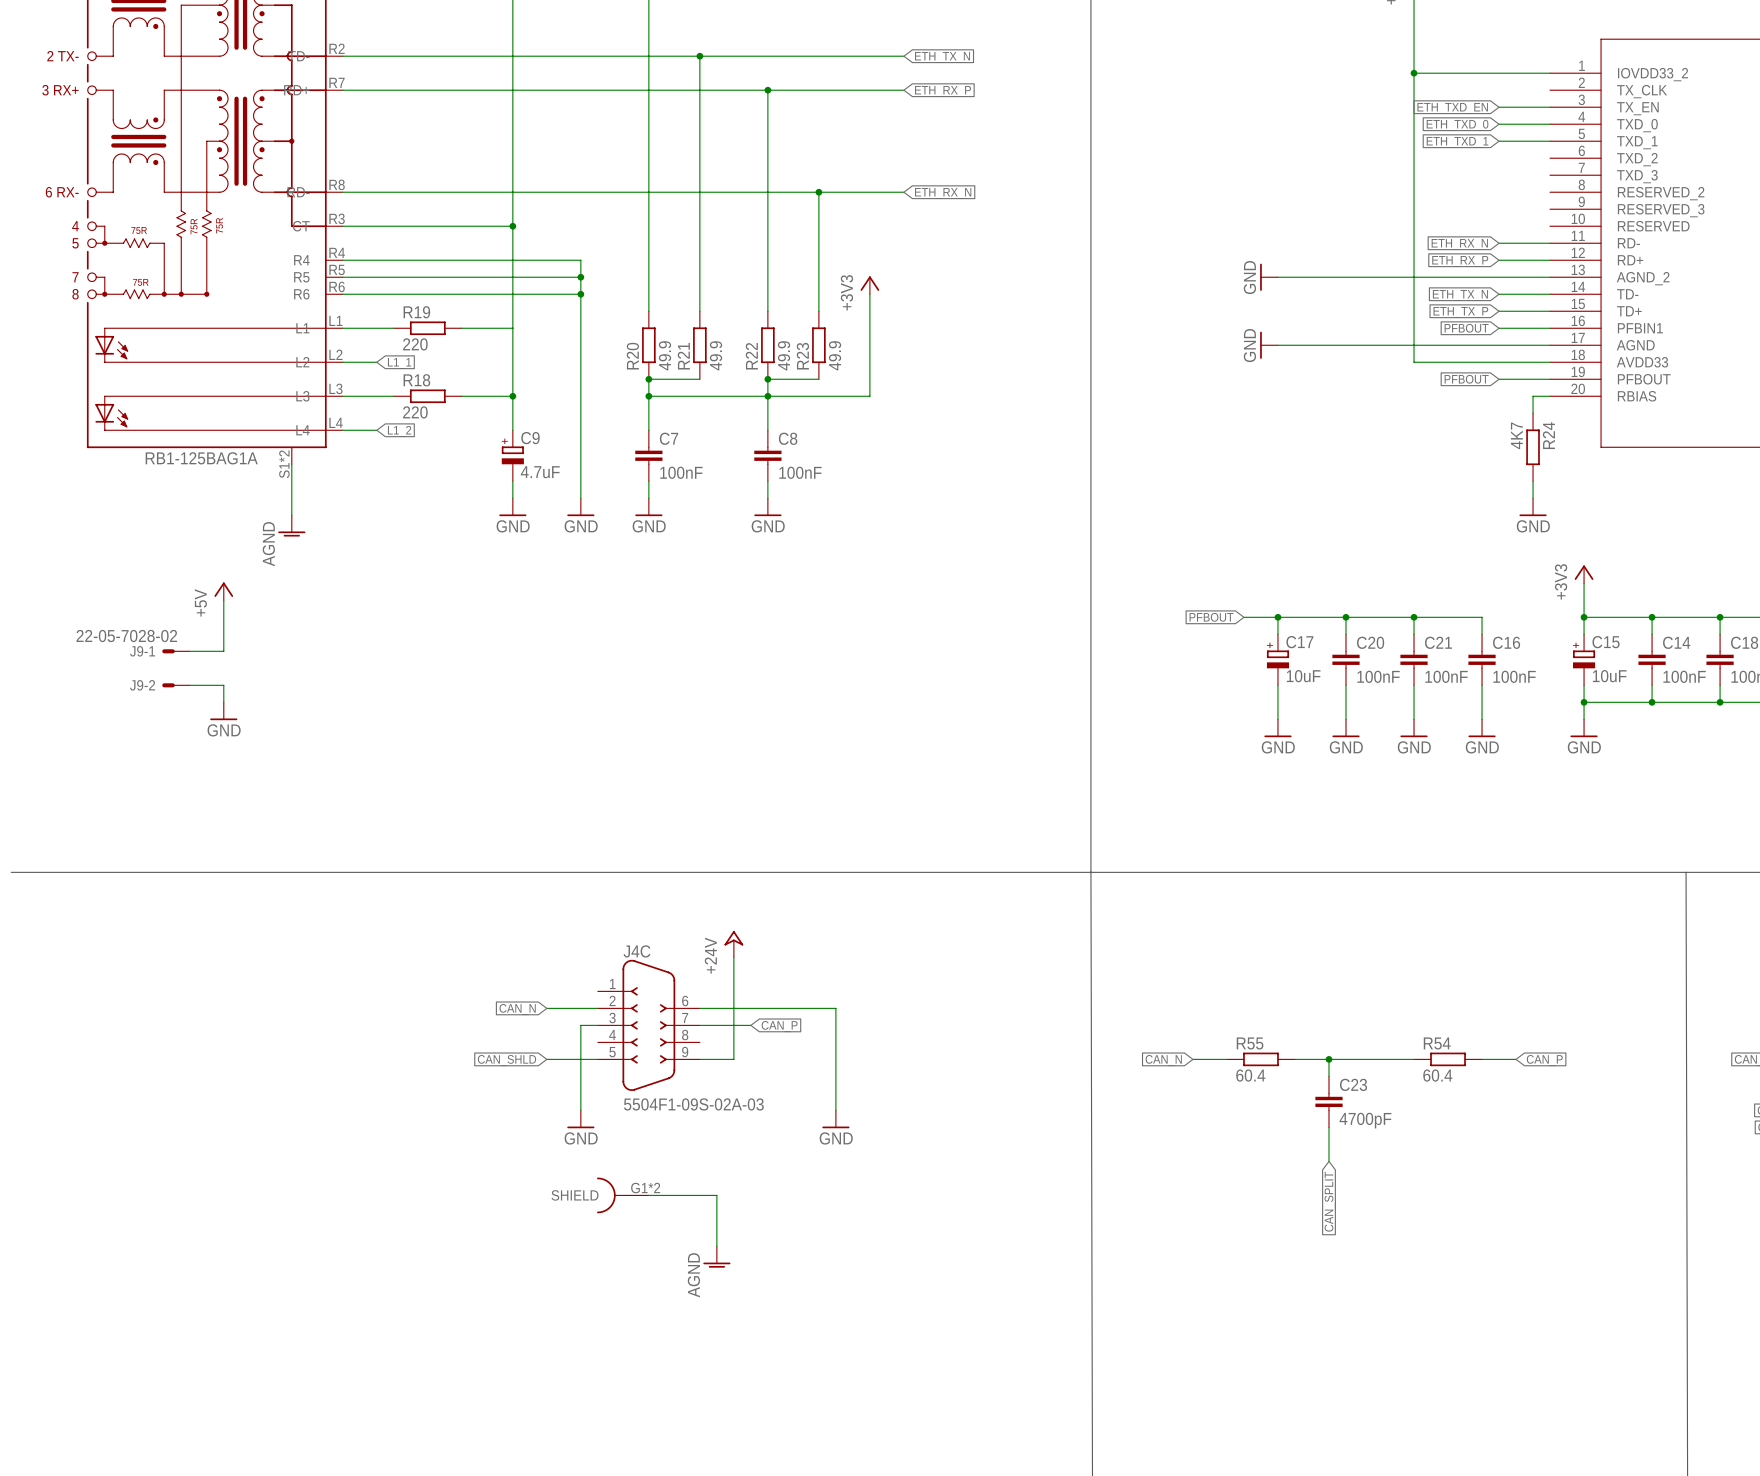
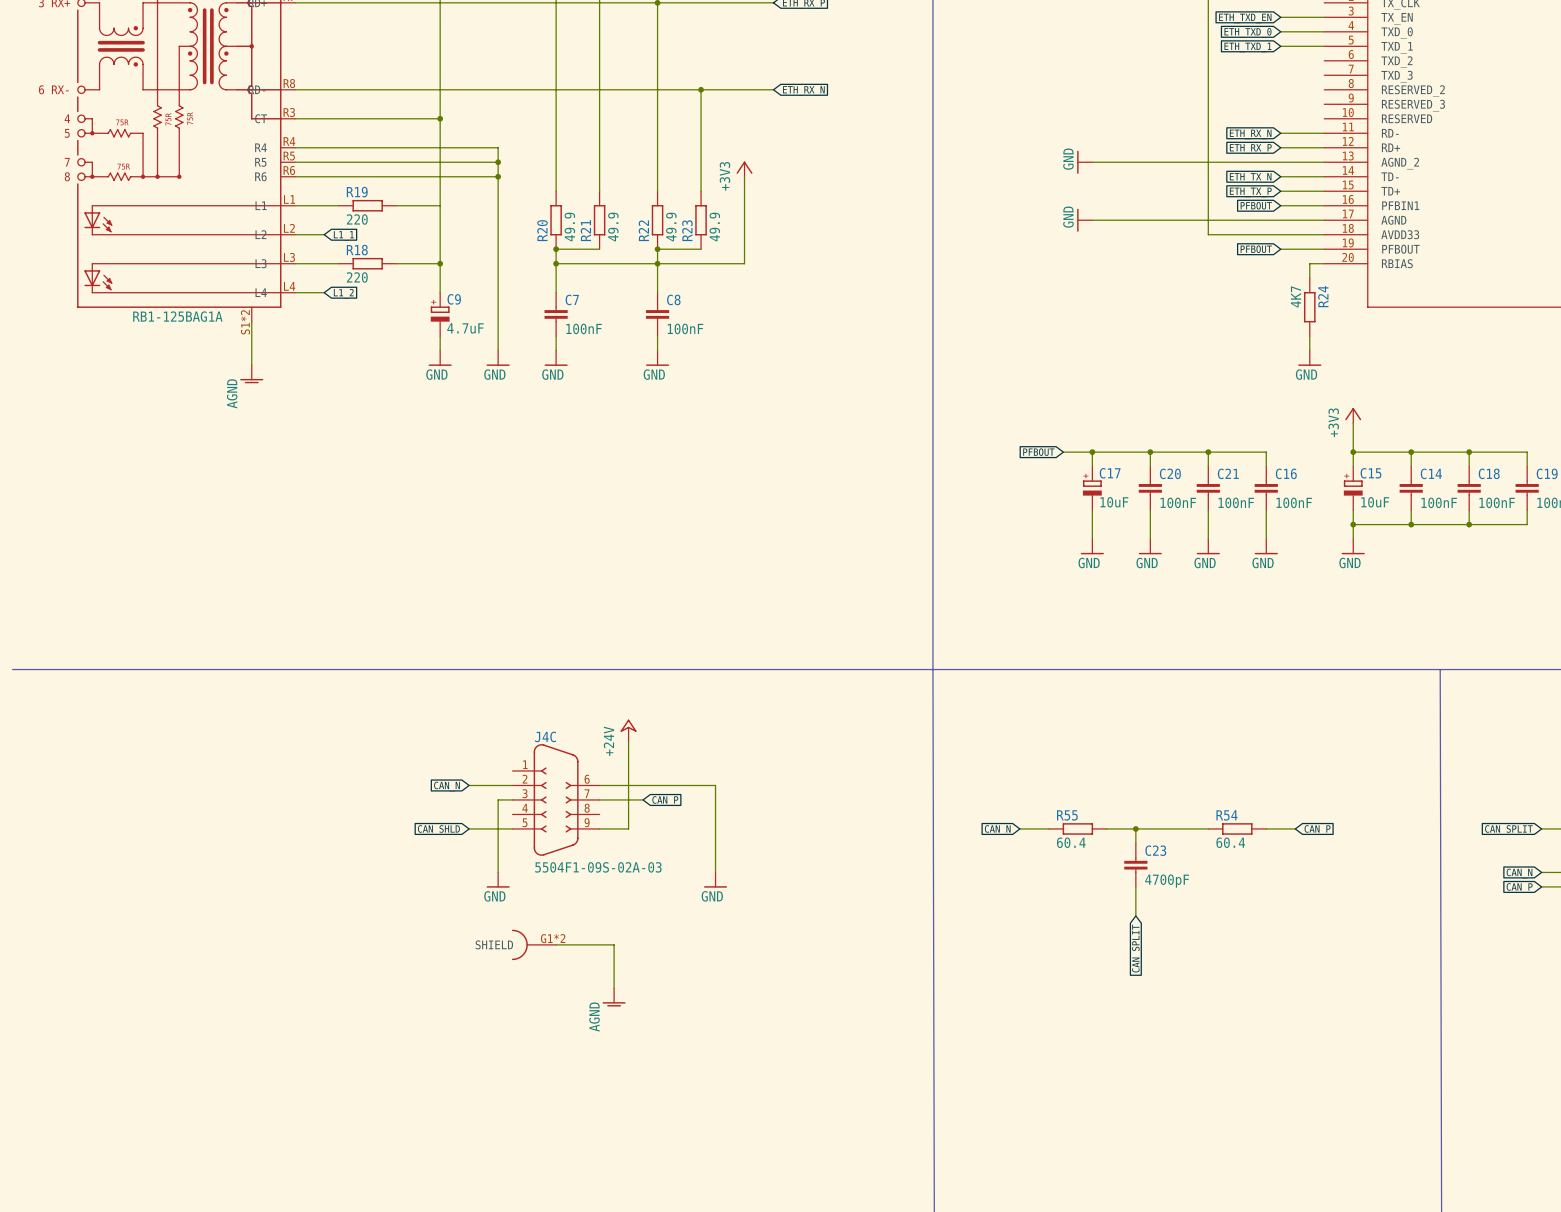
power symbol: +5V (223, 591) -> none
wire: (223, 600) (223, 651) (189, 651) -> none
J9-1: 22-05-7028-02 (176, 651) -> none
J9-2: (176, 685) -> none
wire: (189, 685) (223, 685) (223, 702) -> none
power symbol: GND (223, 711) -> none

